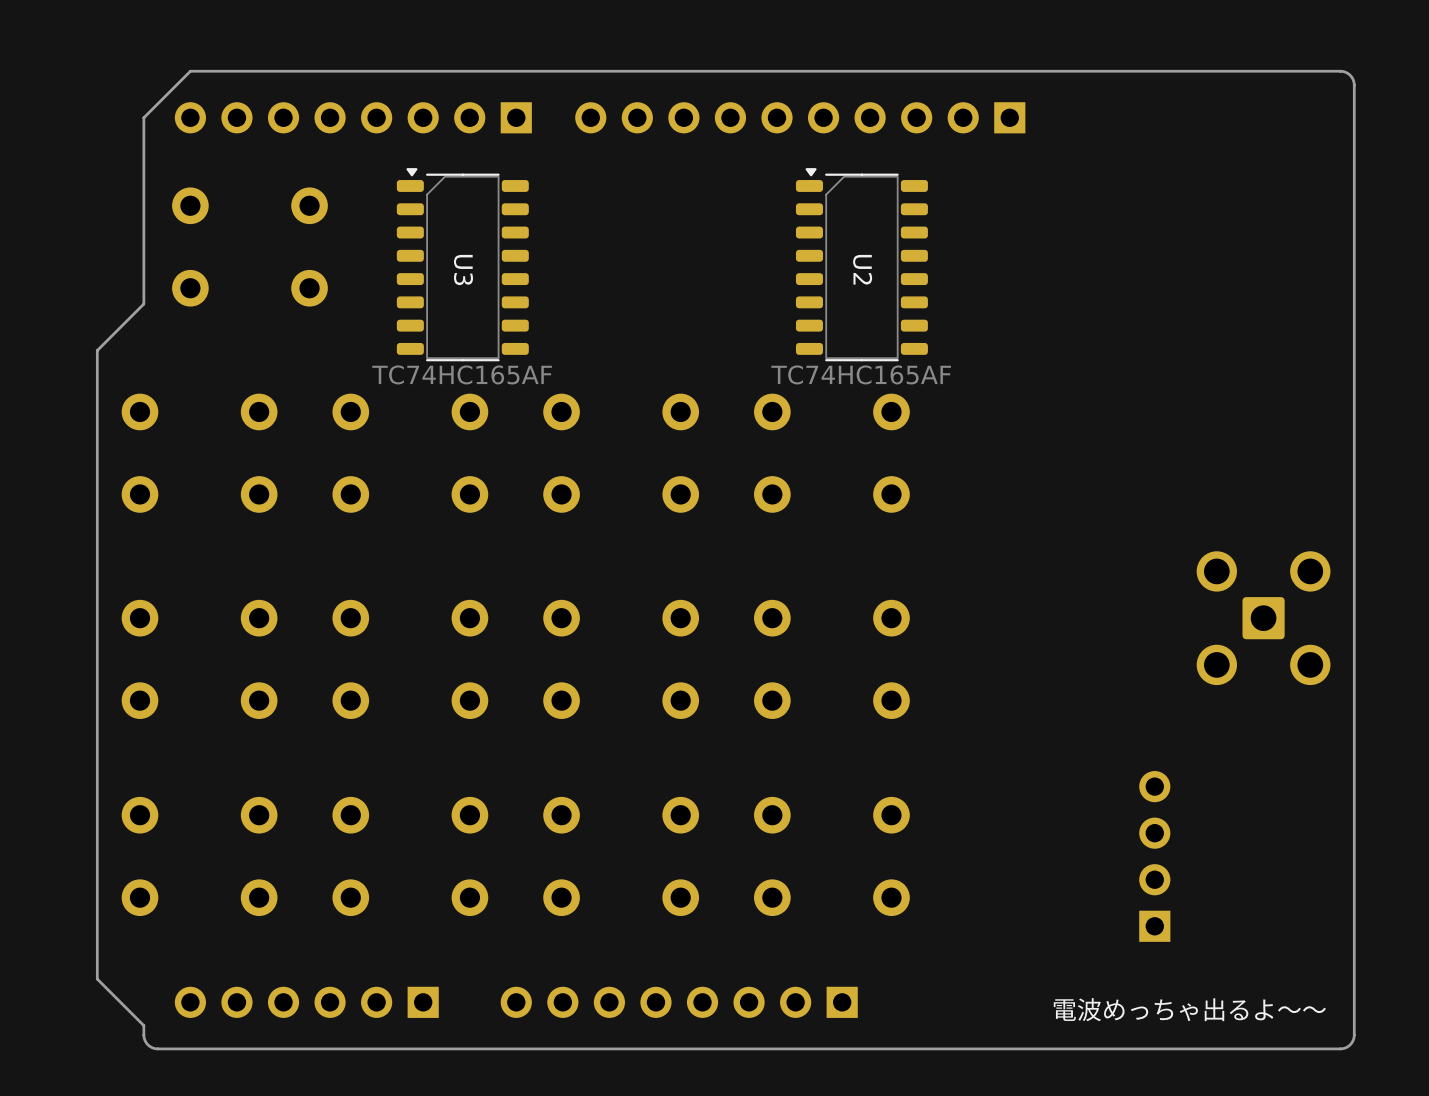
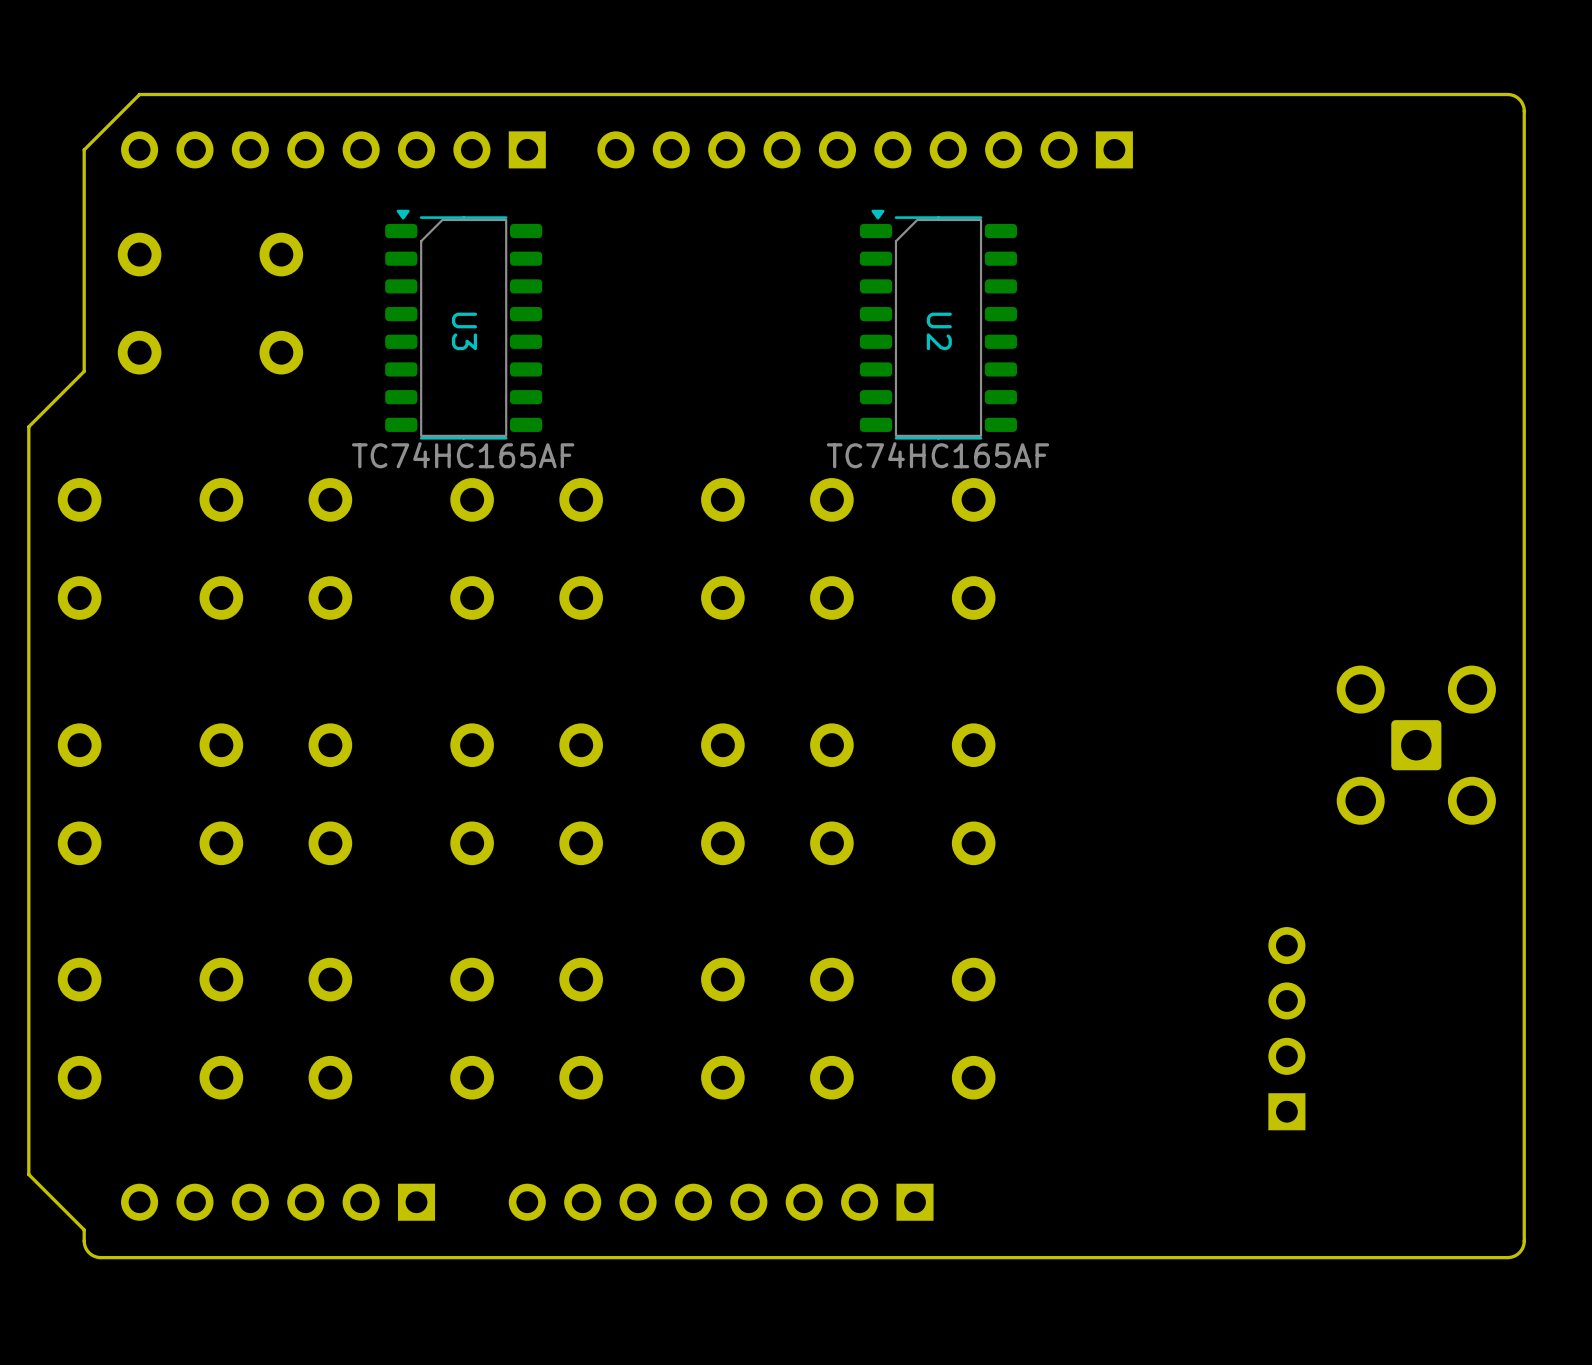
text: 電波めっちゃ出るよ〜〜 (1189, 1009) -> none

